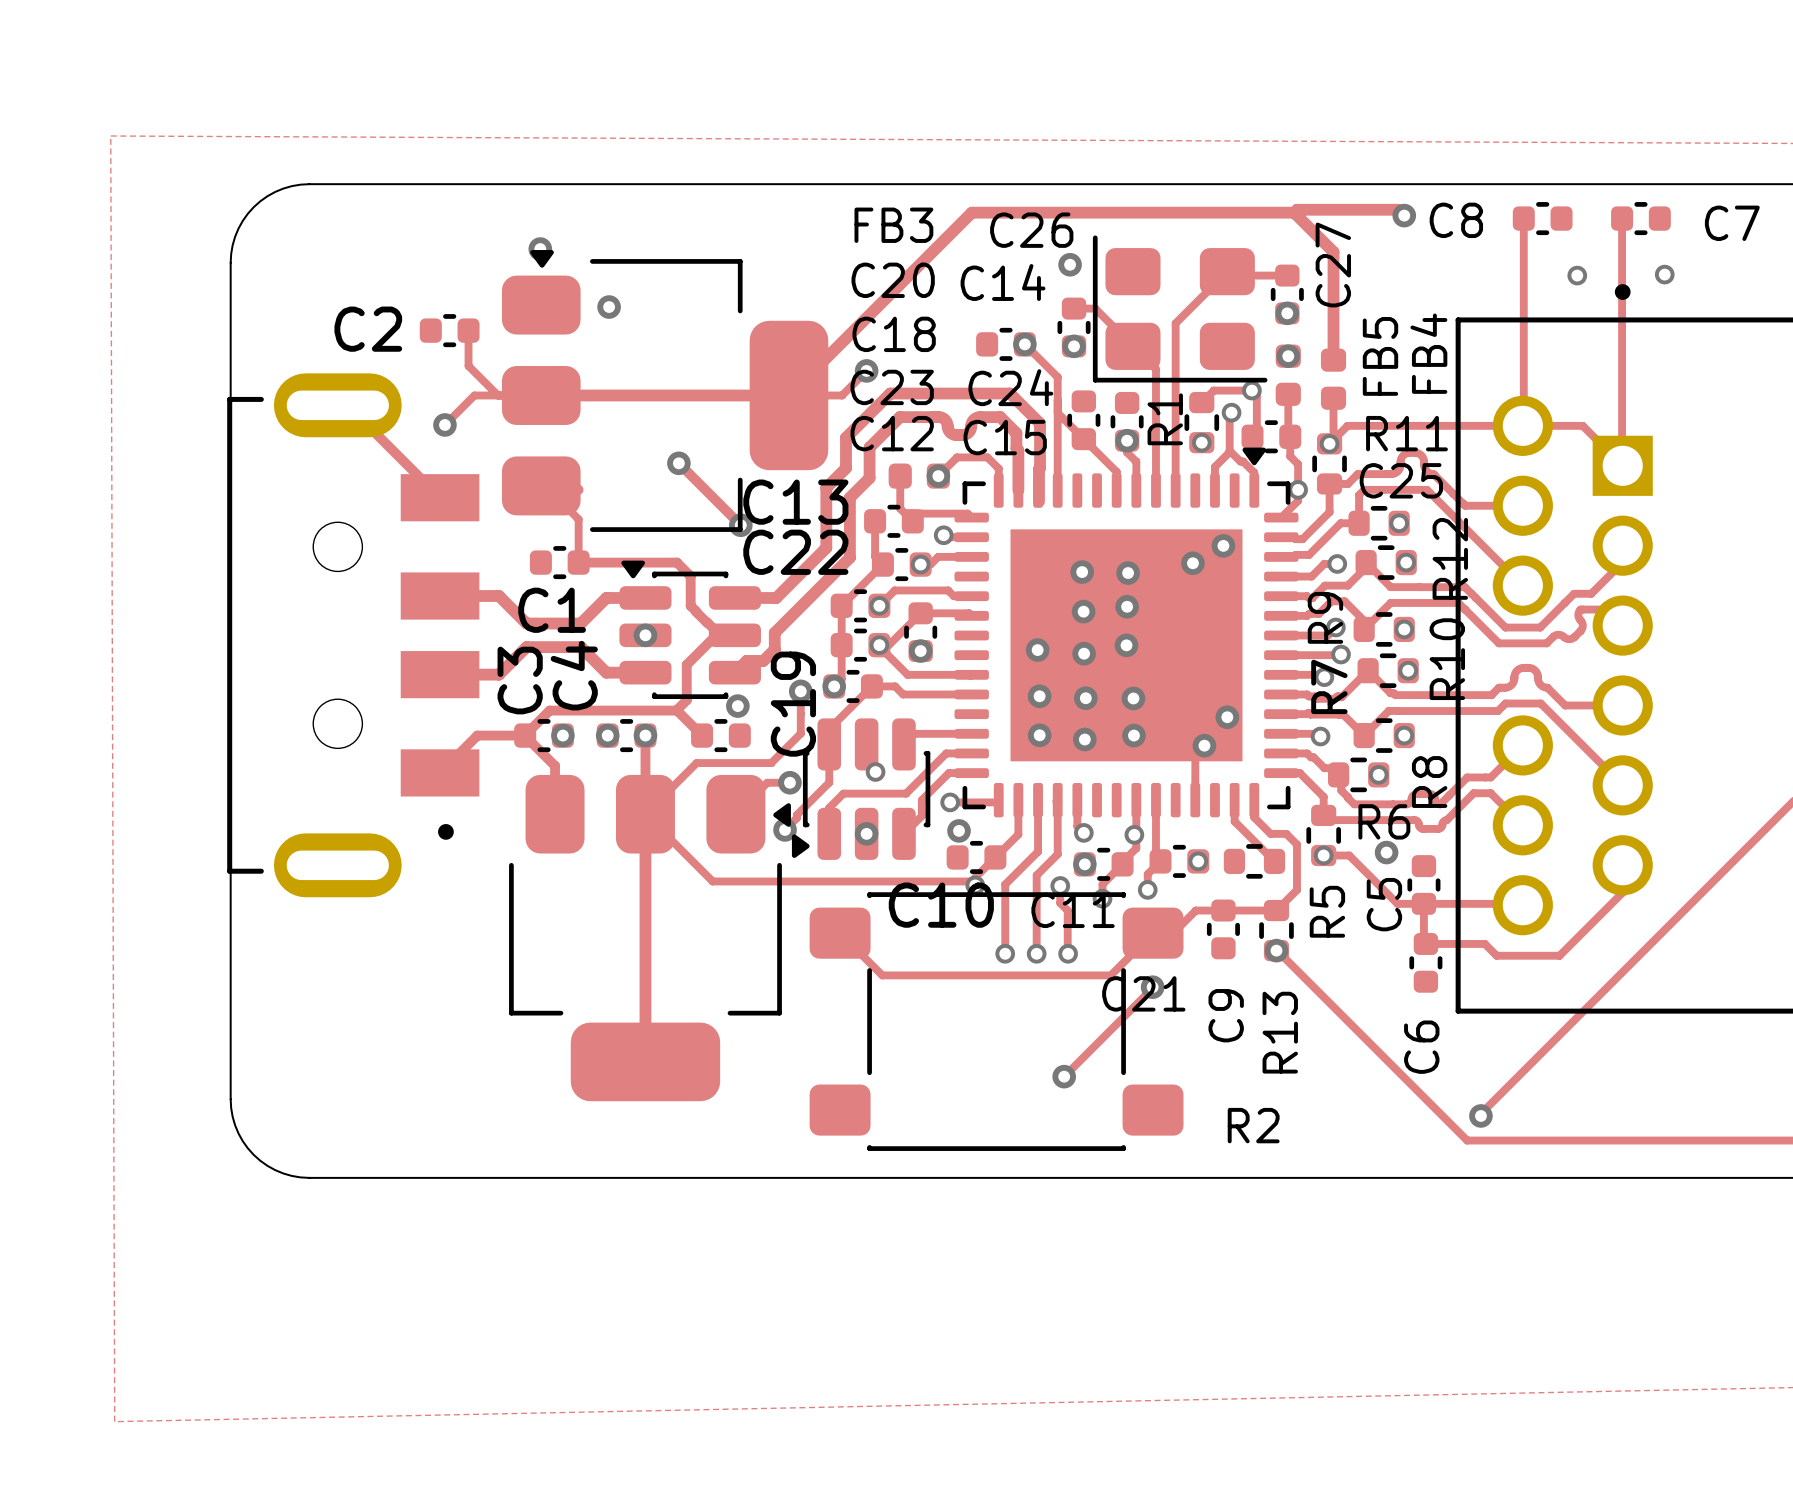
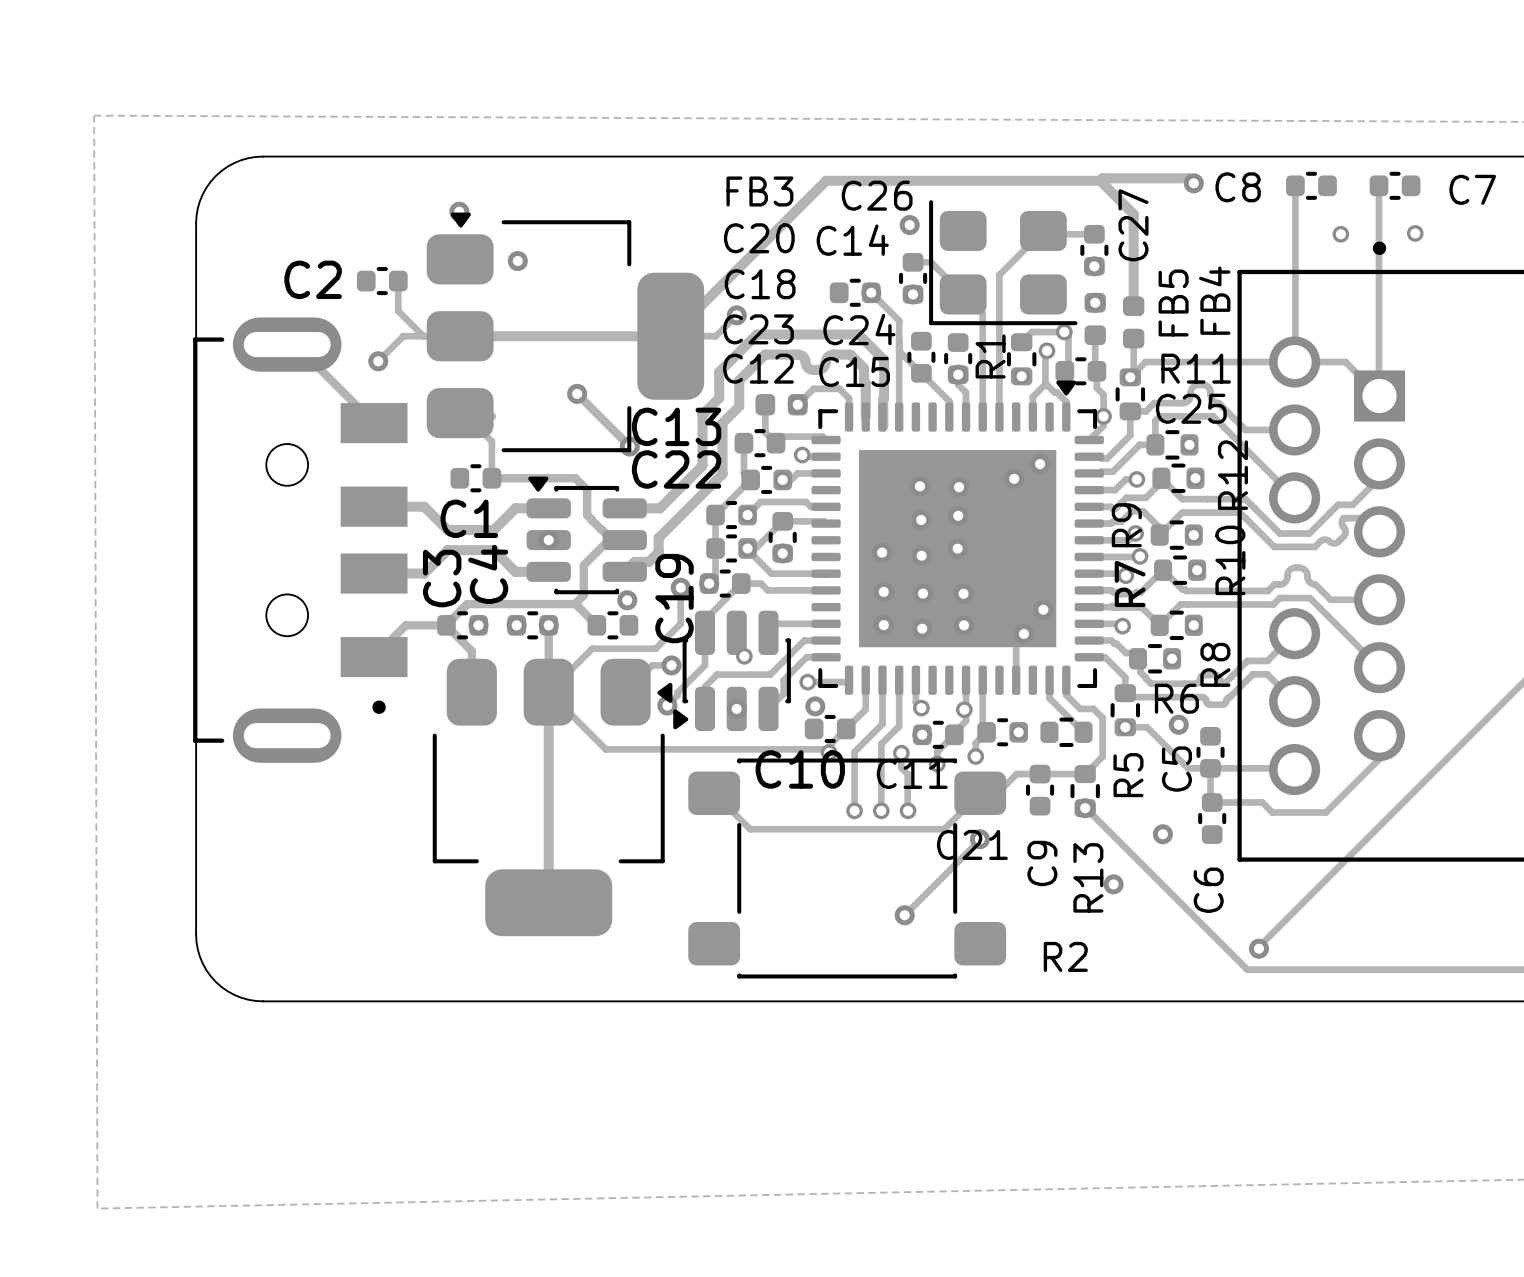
via: none -> (1162, 834)
via: none -> (1113, 884)

